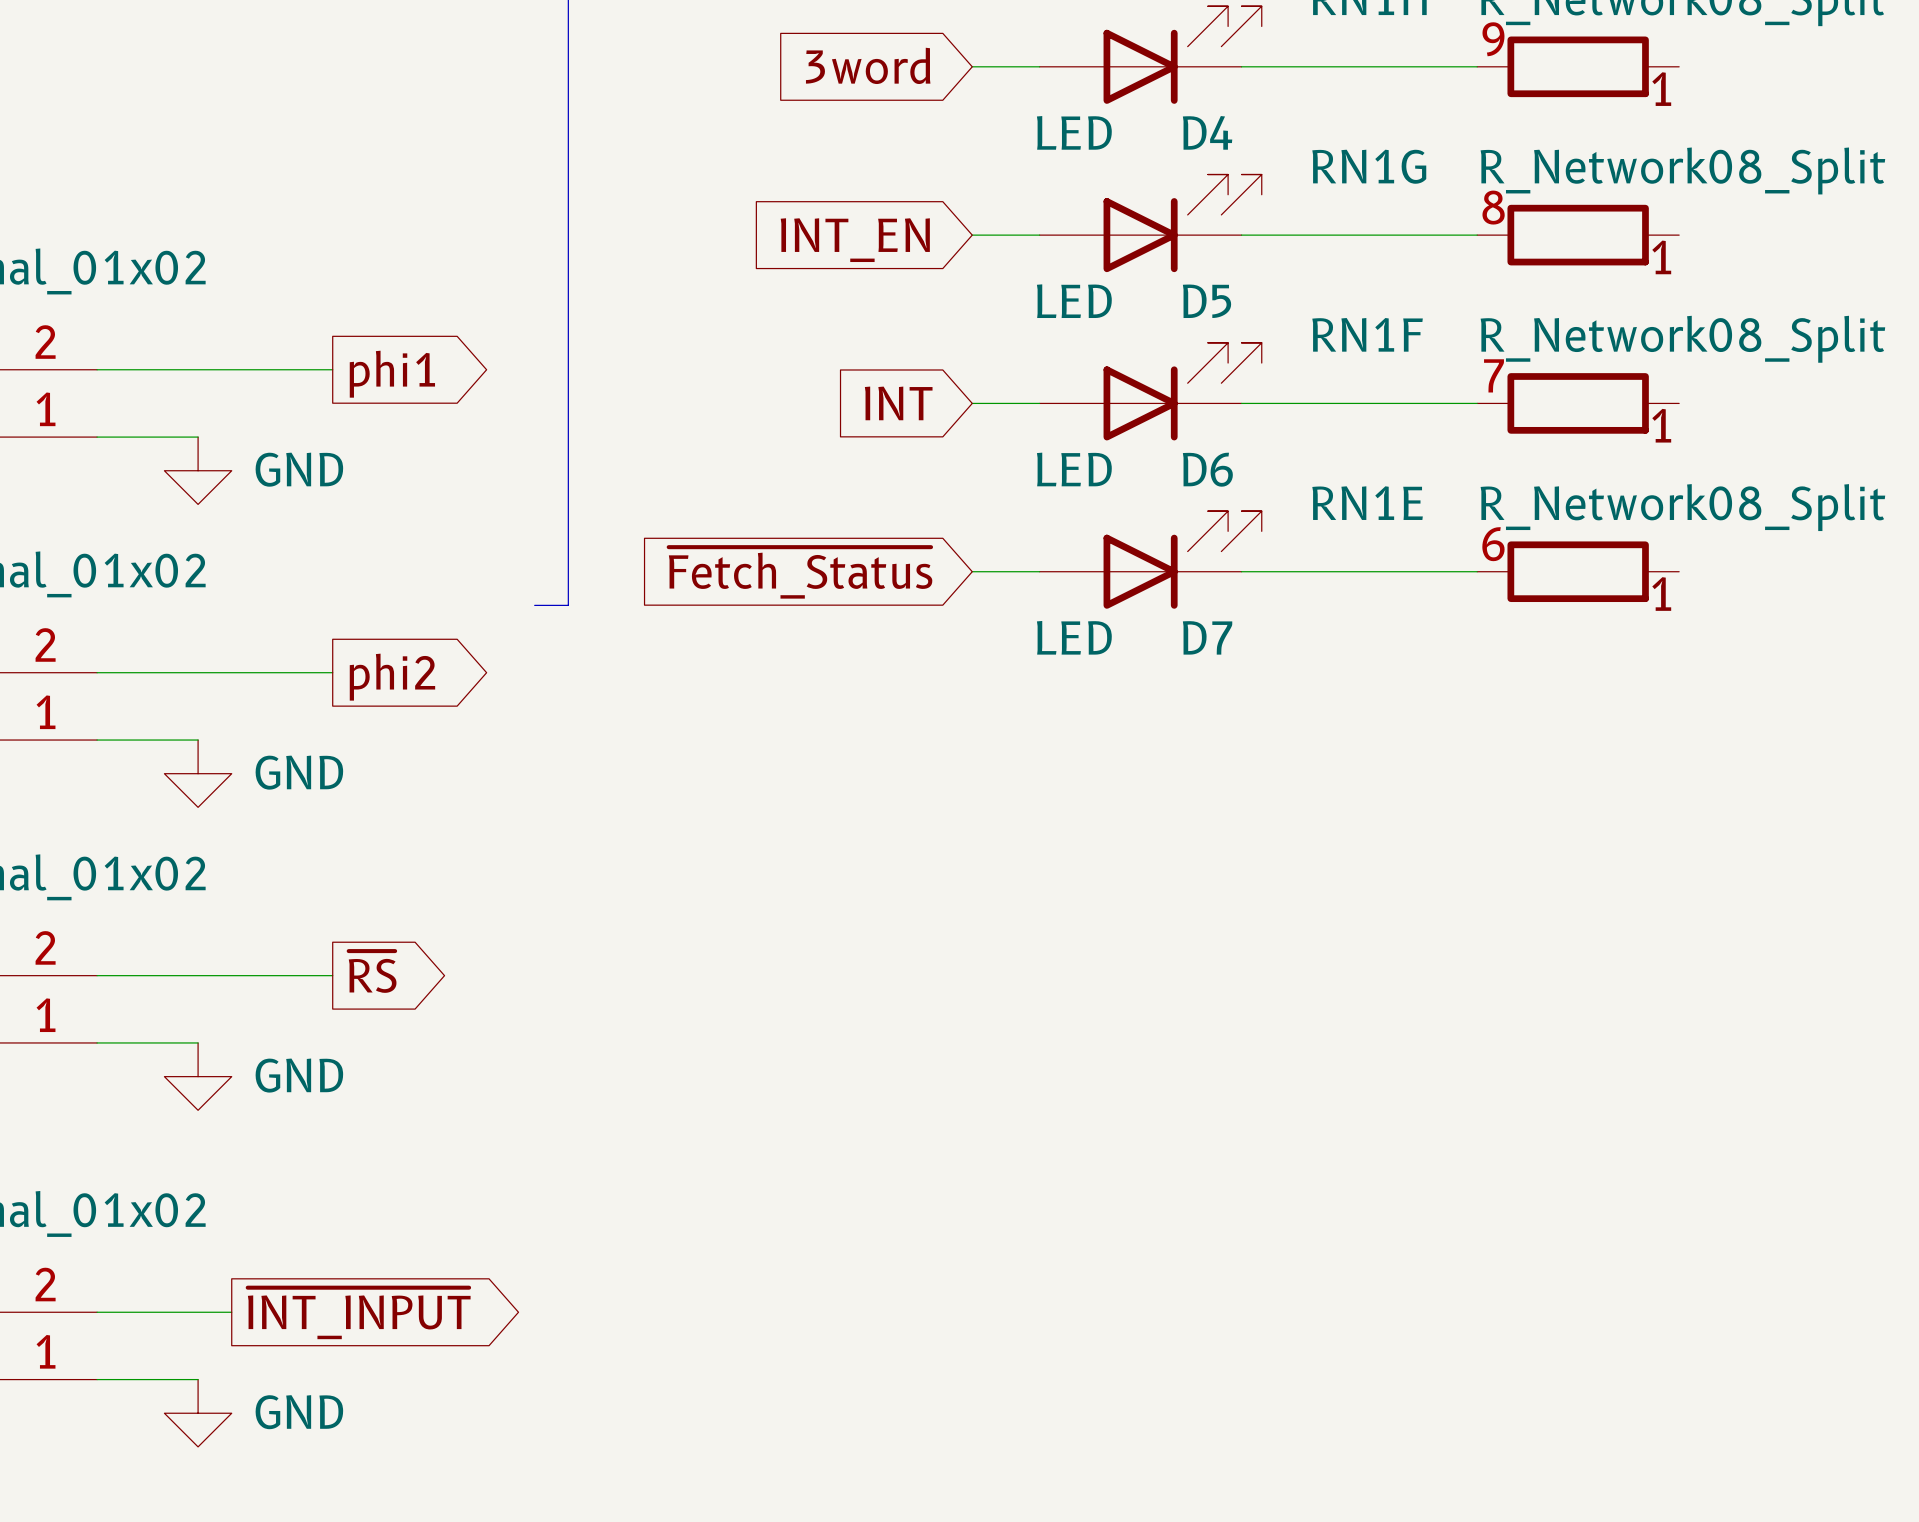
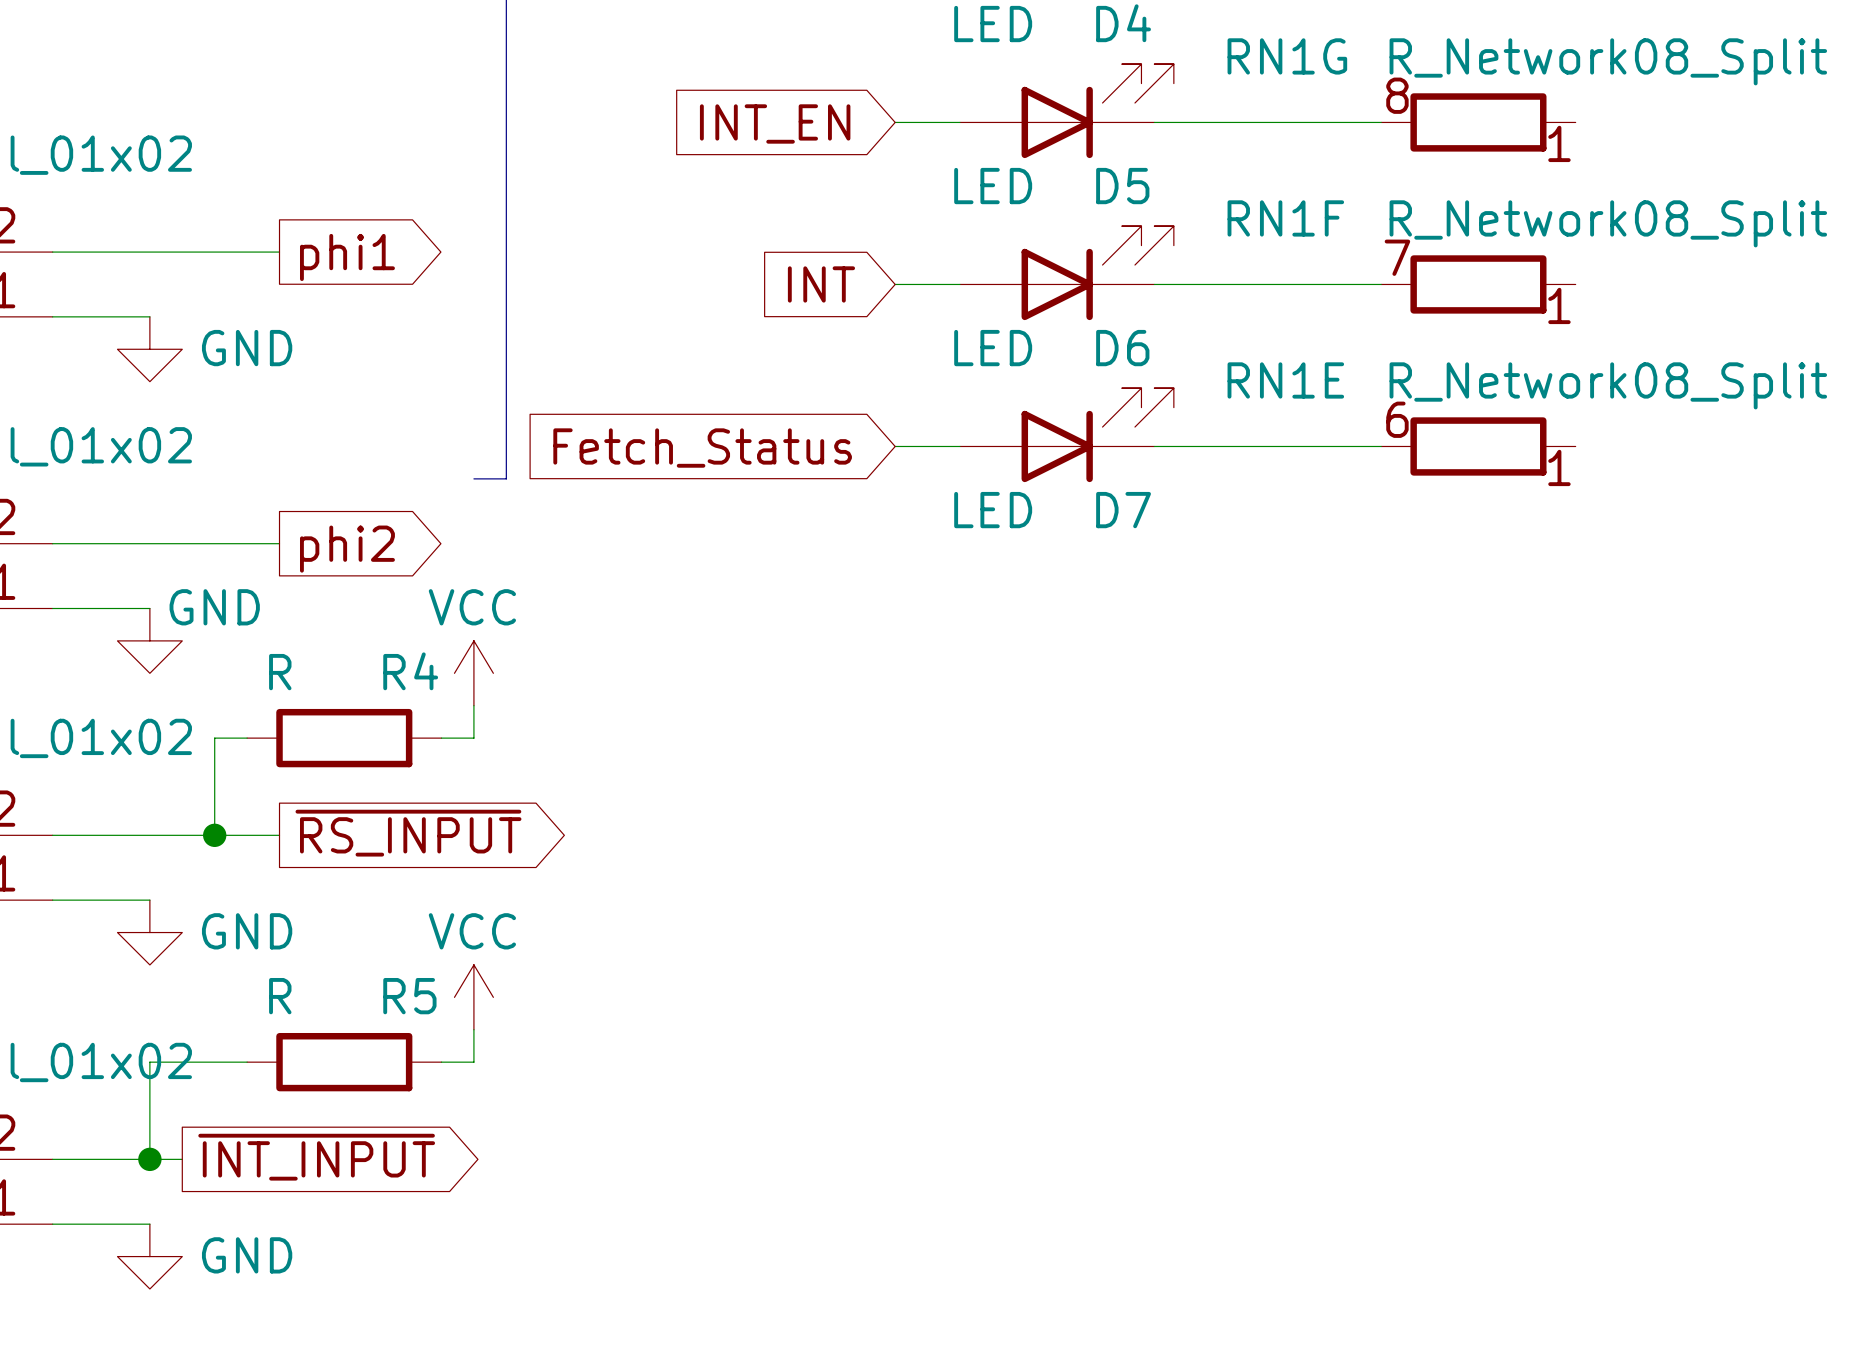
global label: ~{Fetch_Status} (800, 572) -> Fetch_Status (702, 448)
power symbol text position: GND (299, 772) -> GND (214, 607)
power symbol: none -> VCC (473, 673)
wire: none -> (473, 705) (473, 738) (441, 738)
wire: none -> (247, 738) (214, 738) (214, 835)
R4: none -> R (344, 738)
global label: ~{RS} (372, 971) -> ~{RS_INPUT} (408, 833)
junction: none -> (214, 835)
power symbol: none -> VCC (473, 997)
wire: none -> (473, 1029) (473, 1062) (441, 1062)
wire: none -> (247, 1062) (149, 1062) (149, 1159)
R5: none -> R (344, 1062)
junction: none -> (149, 1159)

